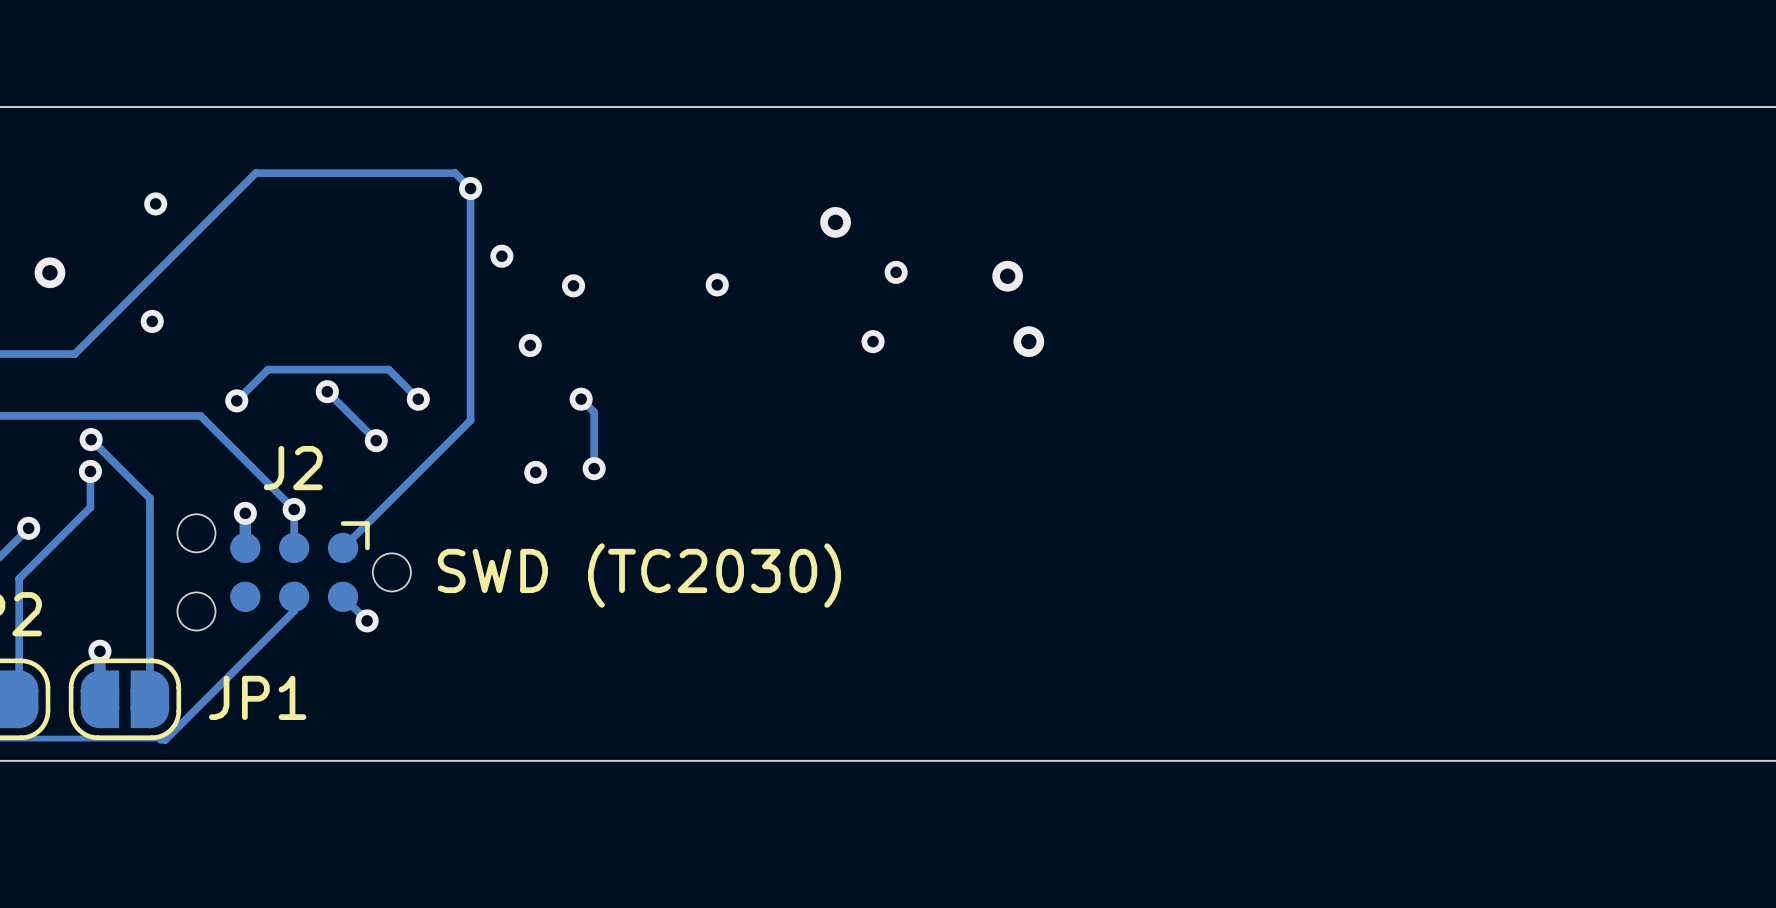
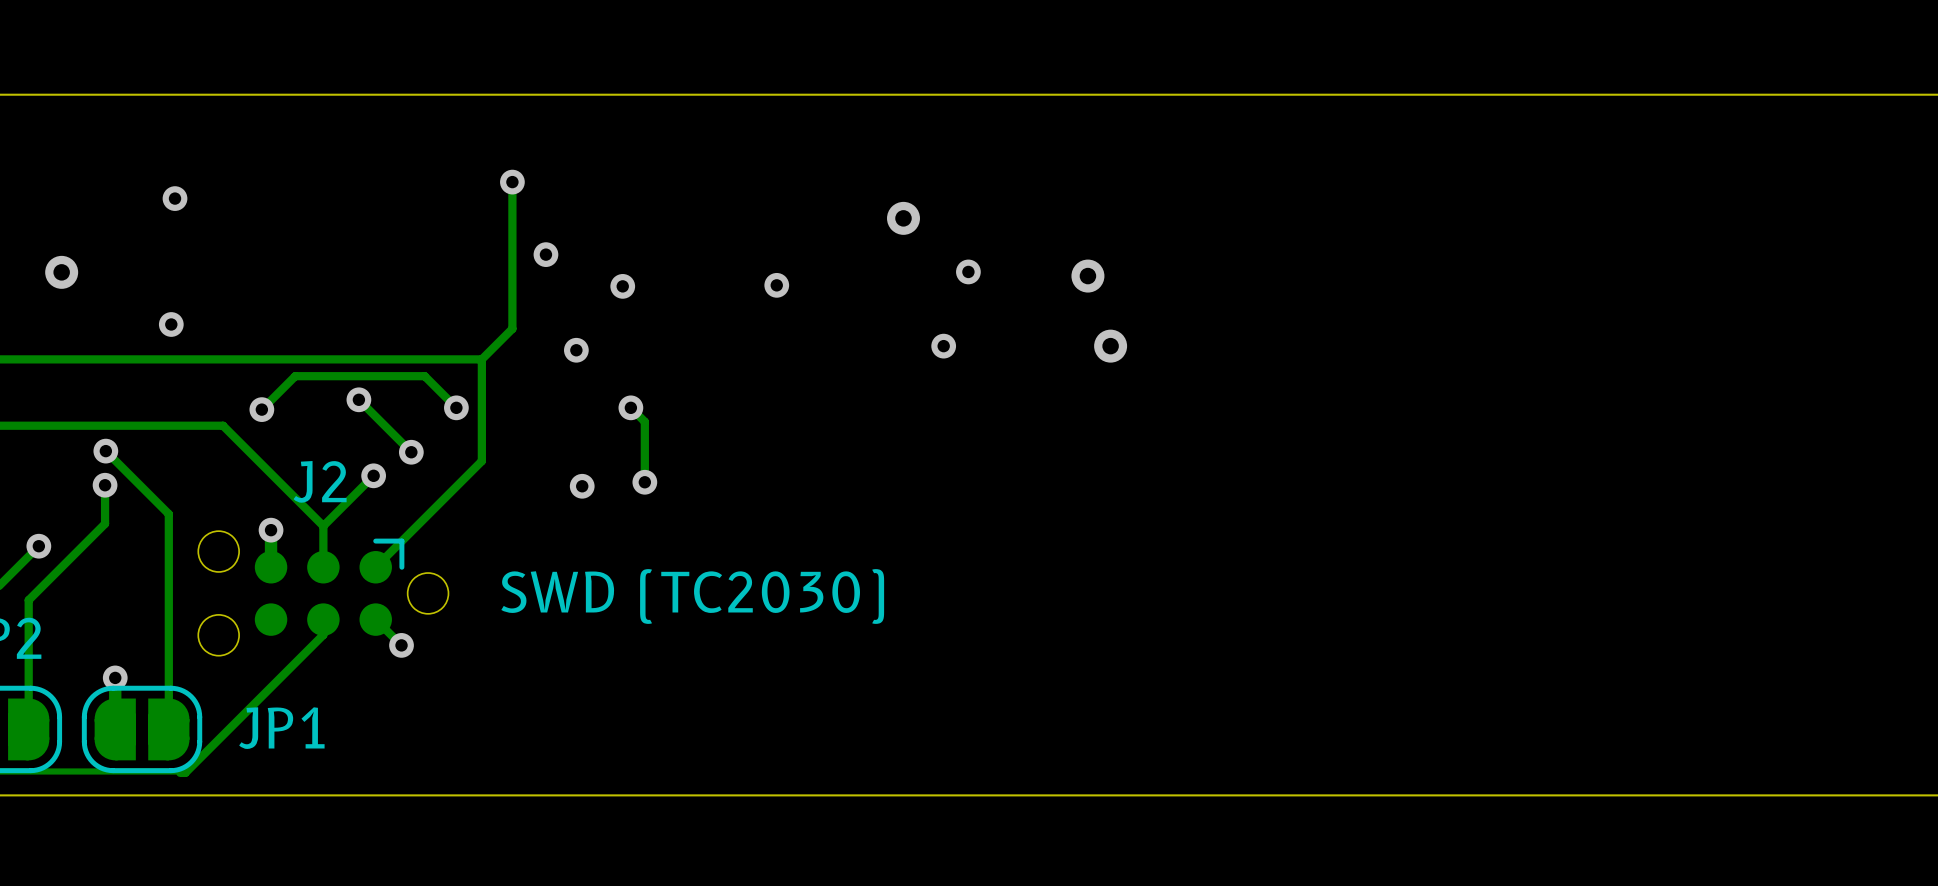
track: (470, 188) (455, 173) (255, 173) (74, 354) -> (481, 359) (88, 359)
track: (470, 325) (470, 420) (442, 448) -> (481, 359) (481, 461)
track: none -> (512, 328) (481, 359)
track: none -> (373, 475) (323, 526)
via position: (294, 509) -> (373, 475)

